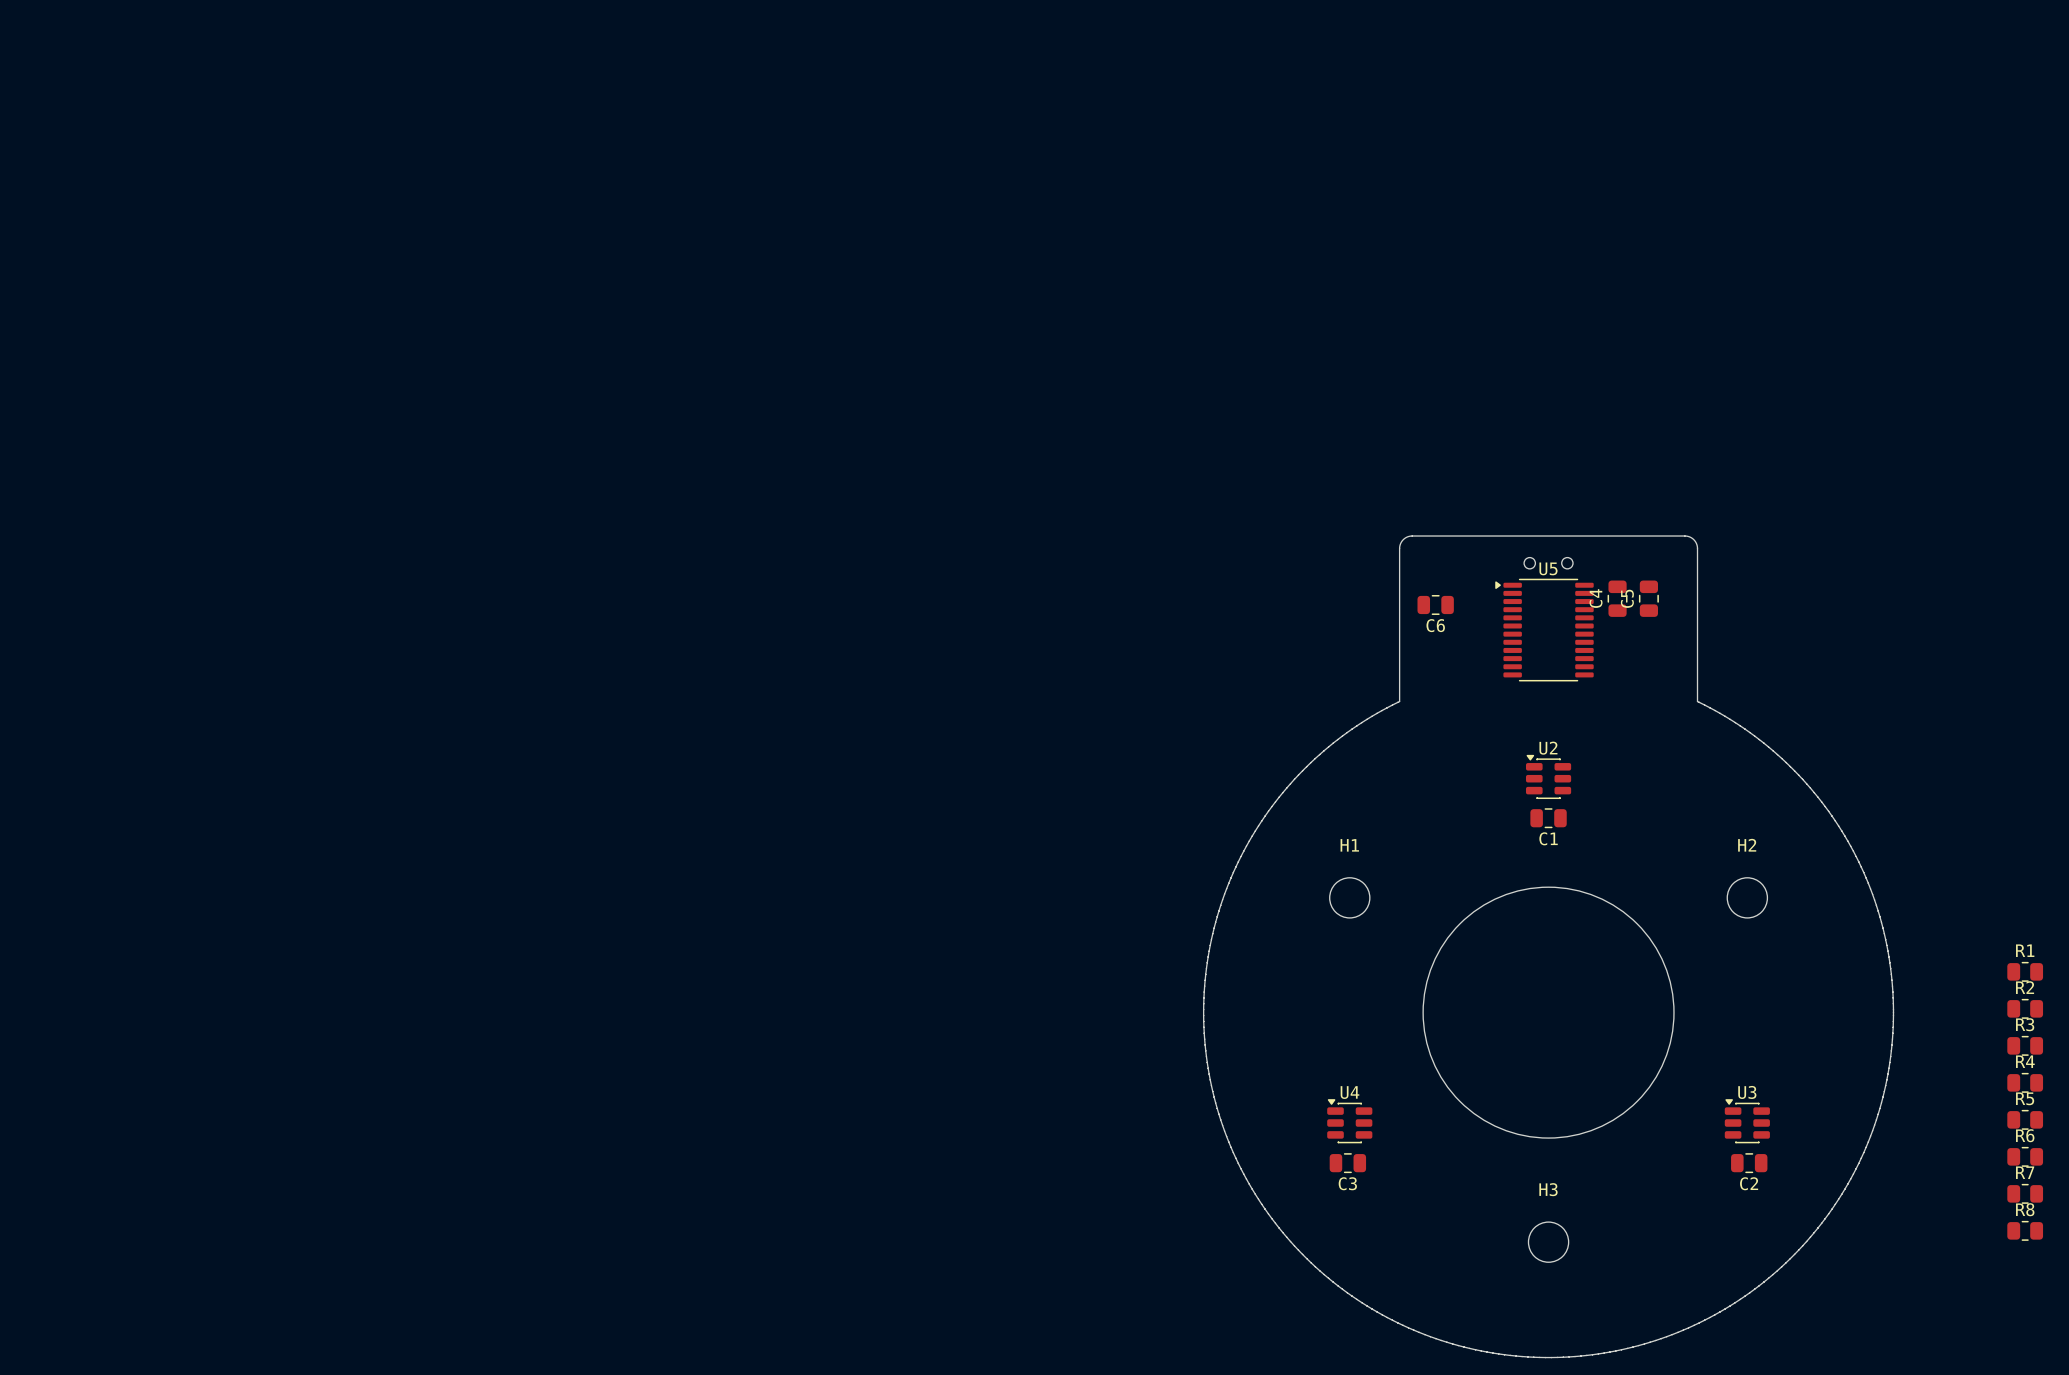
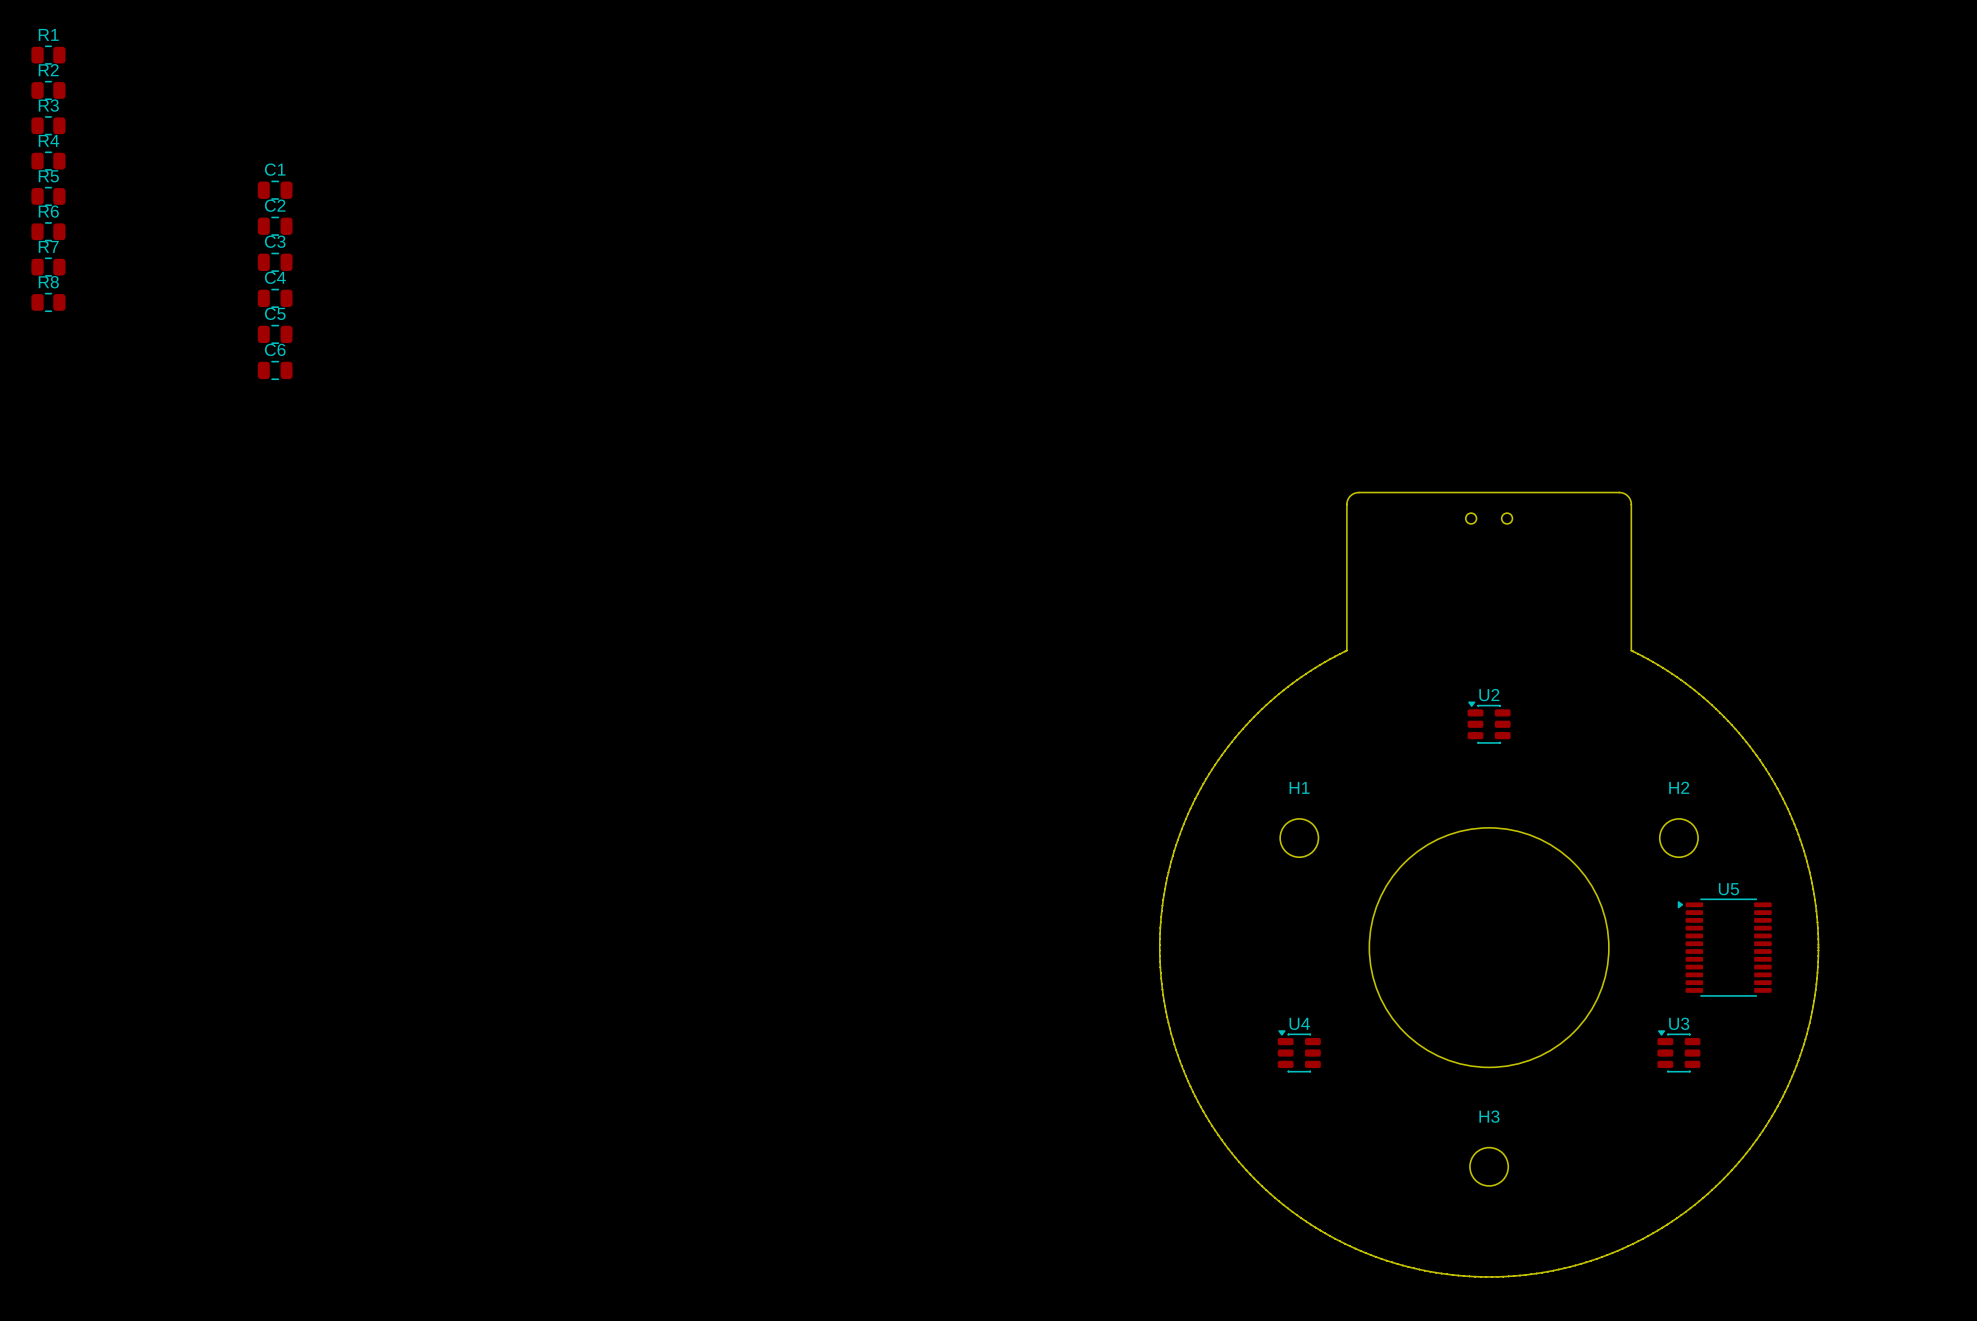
C4 rotation: 0° (1617, 598) -> 90° clockwise (275, 298)
C4 position: (1617, 598) -> (275, 298)
C5 rotation: 0° (1648, 598) -> 90° clockwise (275, 334)
C5 position: (1648, 598) -> (275, 334)
C6 position: (1435, 604) -> (275, 370)
C6 name position: C6 (1435, 625) -> C6 (275, 349)
U5 position: (1544, 630) -> (1724, 947)
C1 position: (1548, 818) -> (275, 190)
C1 name position: C1 (1548, 838) -> C1 (275, 169)
R1 position: (2025, 971) -> (48, 55)
R2 position: (2025, 1008) -> (48, 90)
R3 position: (2025, 1045) -> (48, 125)
R4 position: (2025, 1082) -> (48, 161)
R5 position: (2025, 1119) -> (48, 196)
R6 position: (2025, 1156) -> (48, 231)
C3 position: (1347, 1163) -> (275, 262)
C2 position: (1749, 1163) -> (275, 226)
C3 name position: C3 (1347, 1183) -> C3 (275, 241)
C2 name position: C2 (1749, 1183) -> C2 (275, 205)
R7 position: (2025, 1193) -> (48, 267)
R8 position: (2025, 1230) -> (48, 302)

